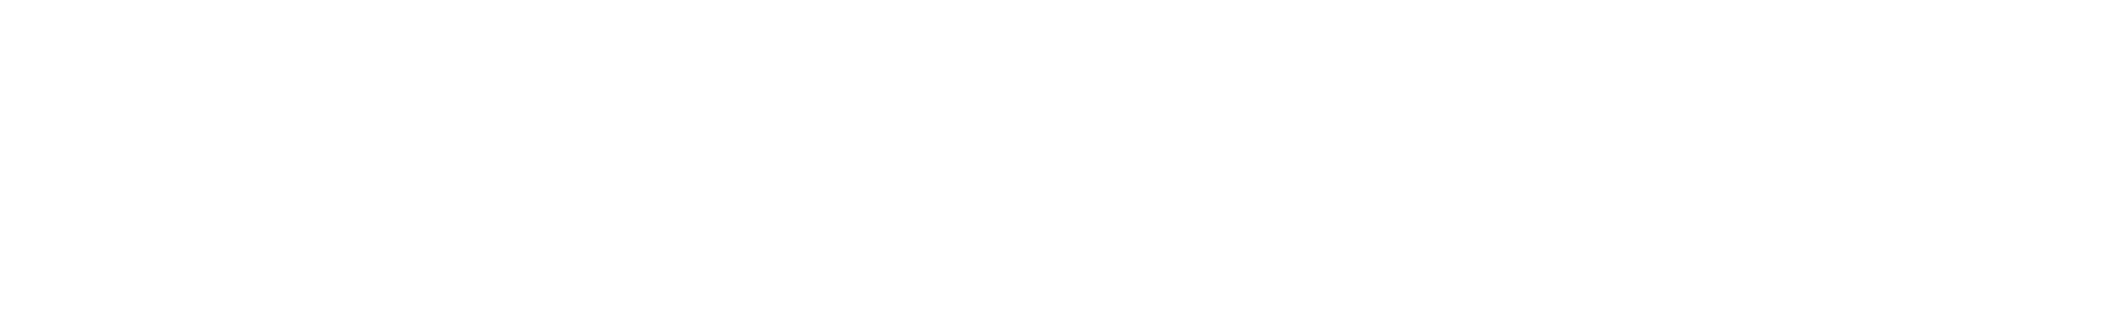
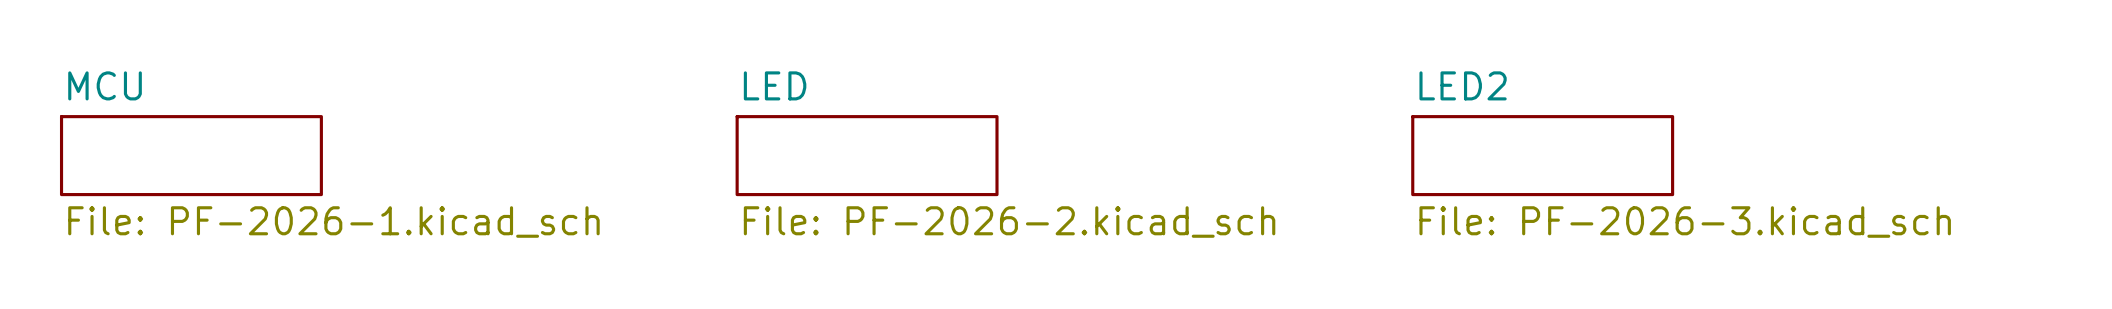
sheet MCU: none -> File: PF-2026-1.kicad_sch (191, 155)
sheet LED: none -> File: PF-2026-2.kicad_sch (867, 155)
sheet LED2: none -> File: PF-2026-3.kicad_sch (1542, 155)

